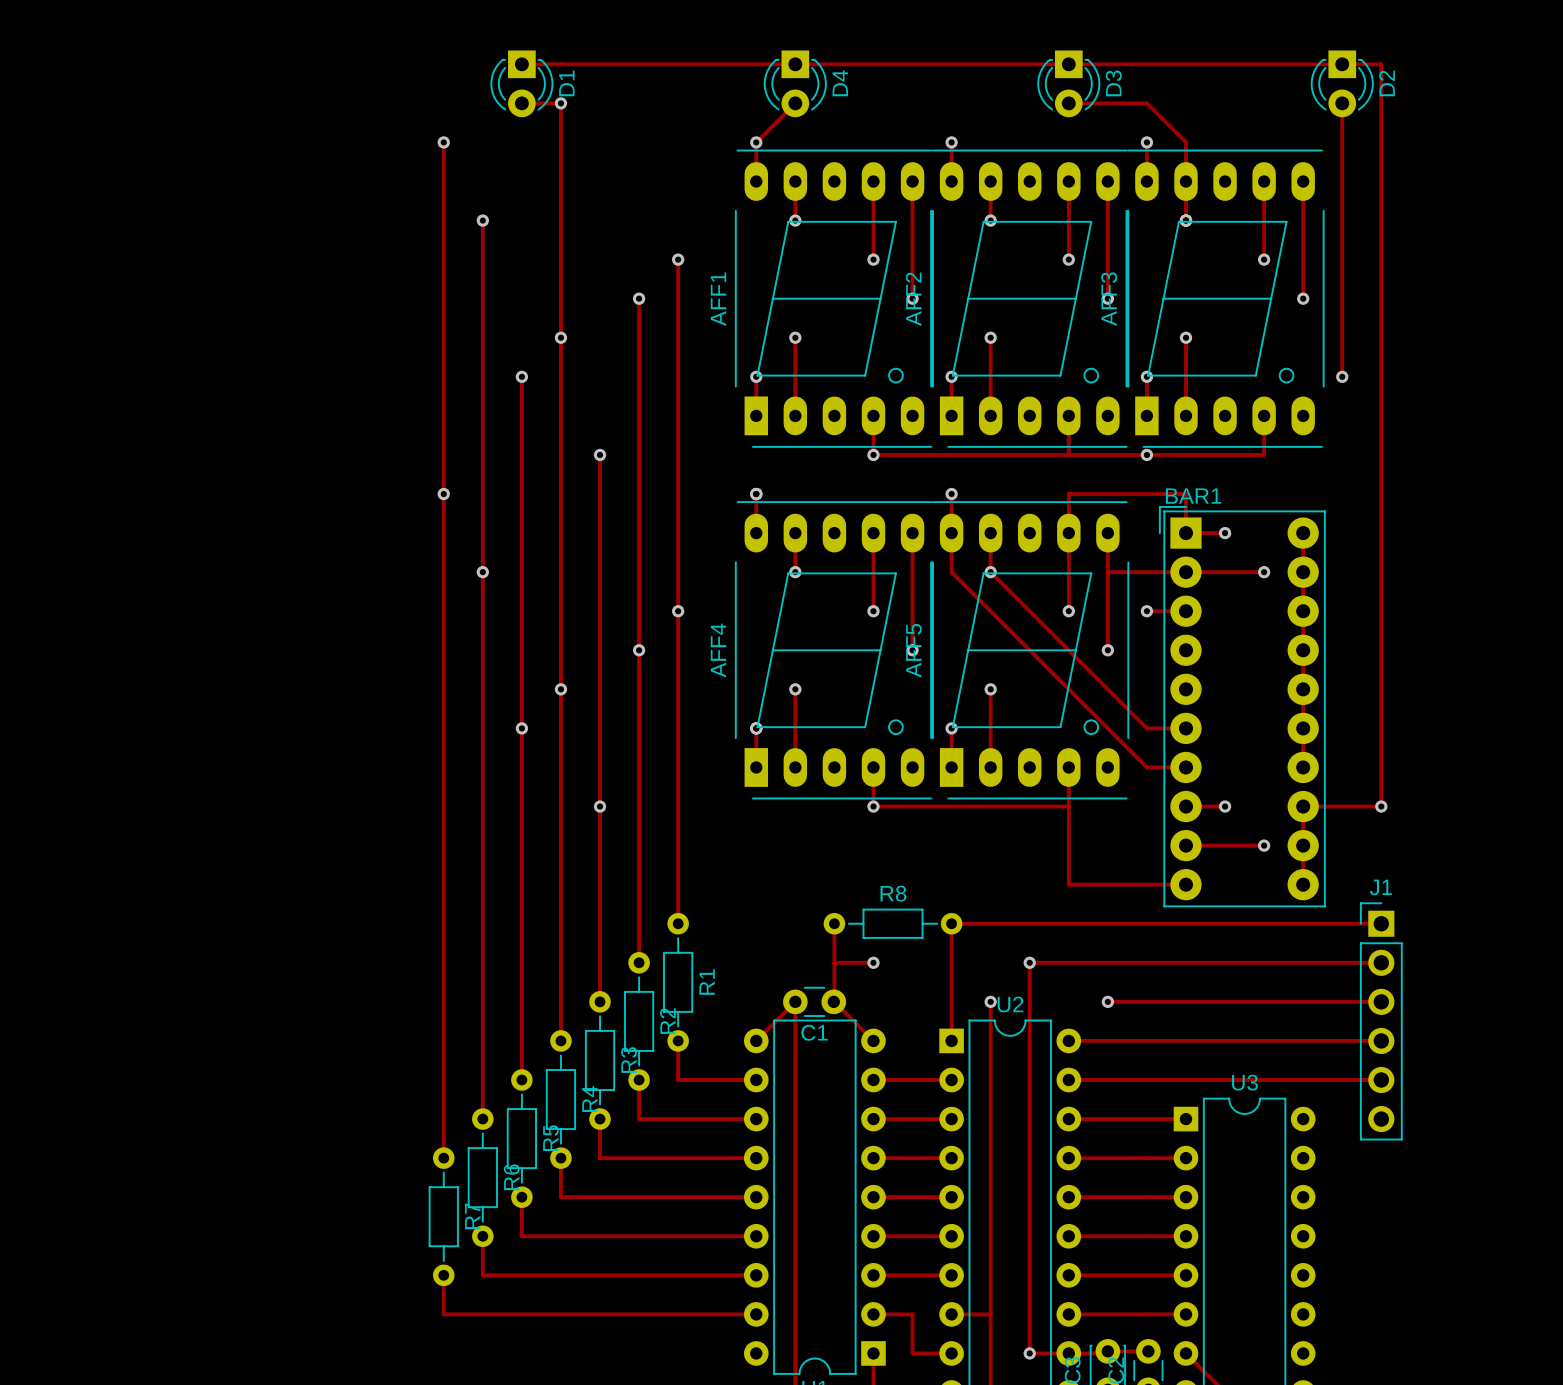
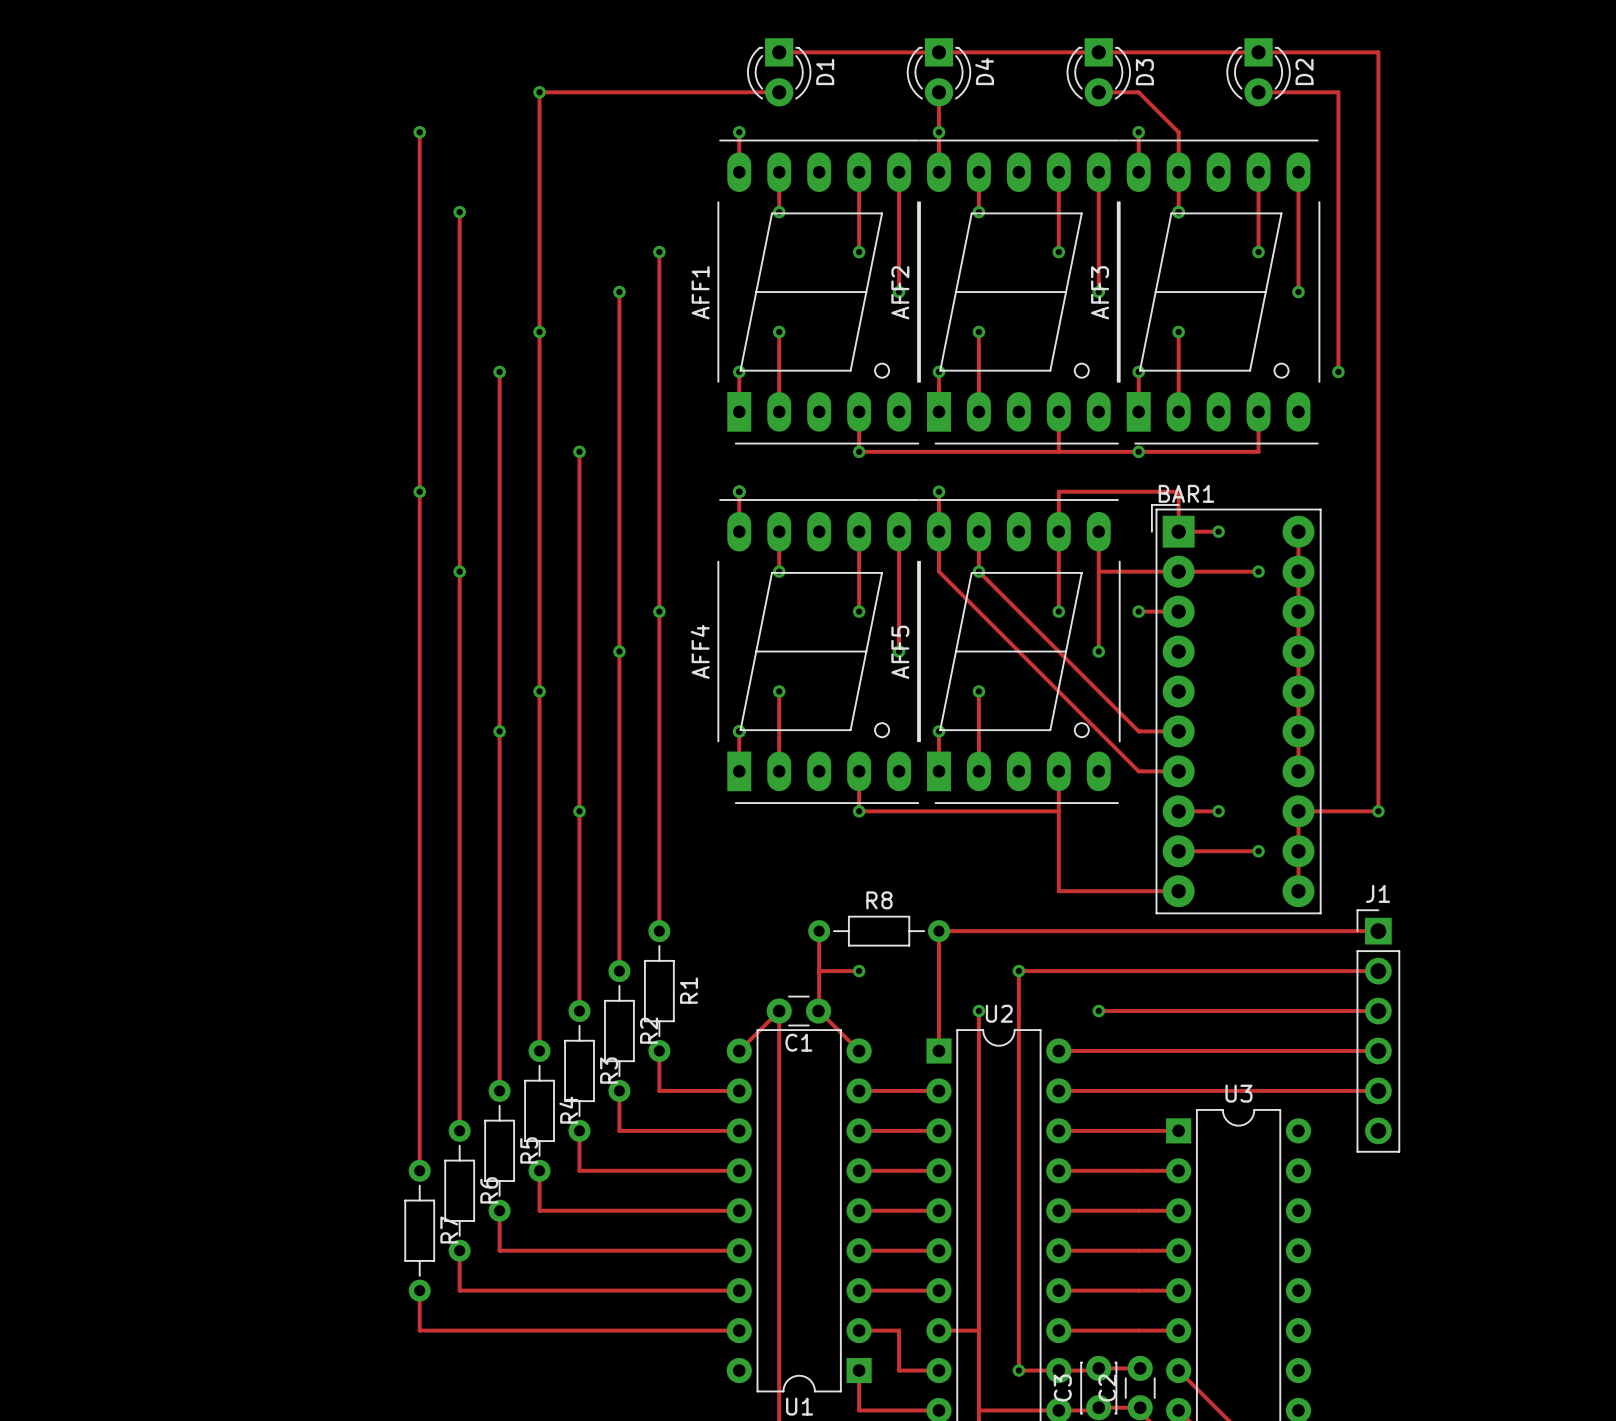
track: (521, 64) (795, 64) -> none
D1: (521, 83) -> none
D4 name: D4 (840, 83) -> D1 (825, 71)
D4: none -> (939, 72)
D3 position: (1068, 83) -> (1098, 72)
D2 position: (1342, 83) -> (1258, 72)
track: (521, 103) (560, 103) -> none
track: (795, 103) (756, 142) -> (779, 92) (539, 92)
track: none -> (939, 92) (939, 132)
track: (1068, 103) (1107, 103) -> none
track: none -> (1258, 92) (1338, 92)

